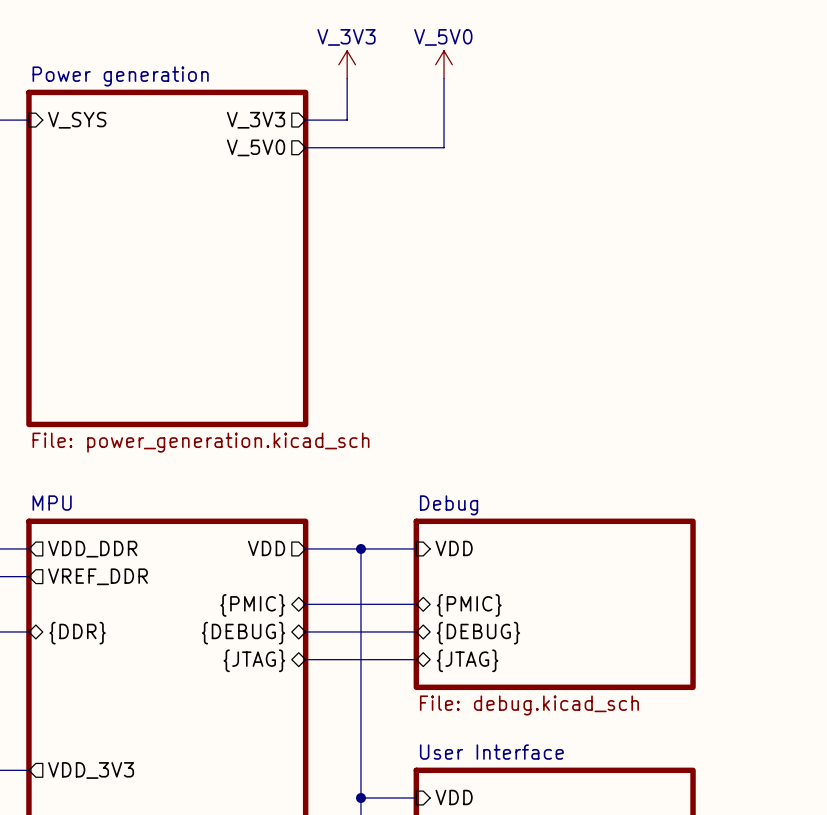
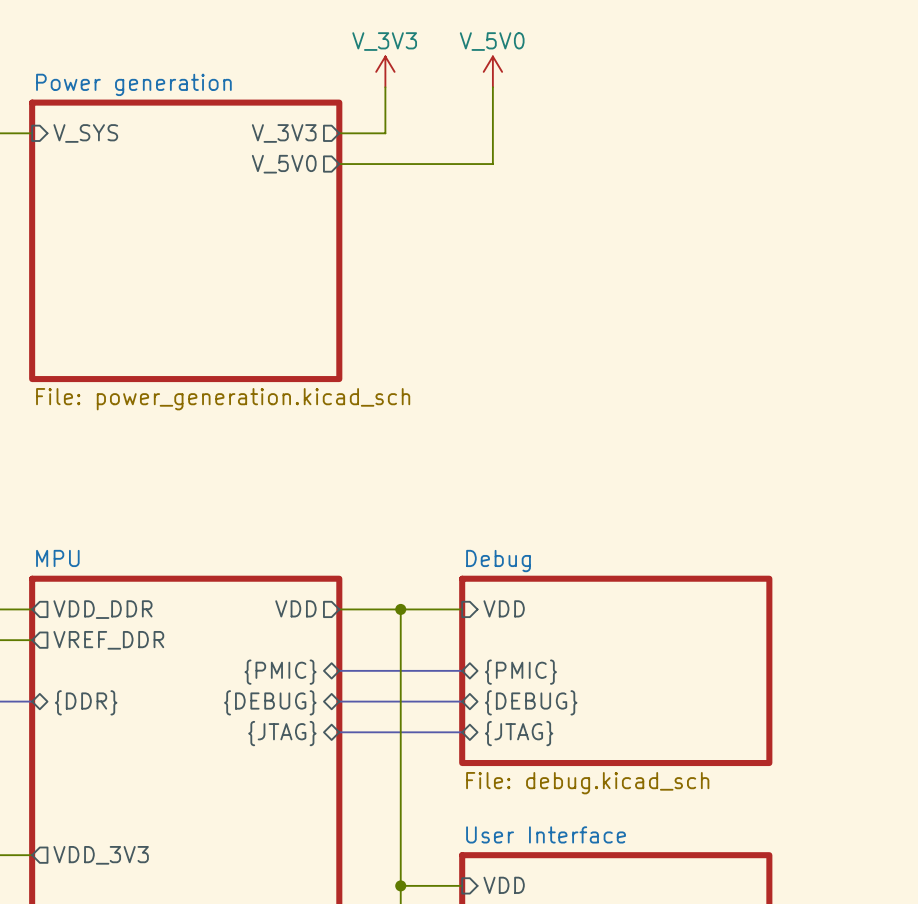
sheet Power generation: none -> File: power_generation.kicad_sch (185, 240)
sheet Power generation: File: power_generation.kicad_sch (167, 258) -> none

